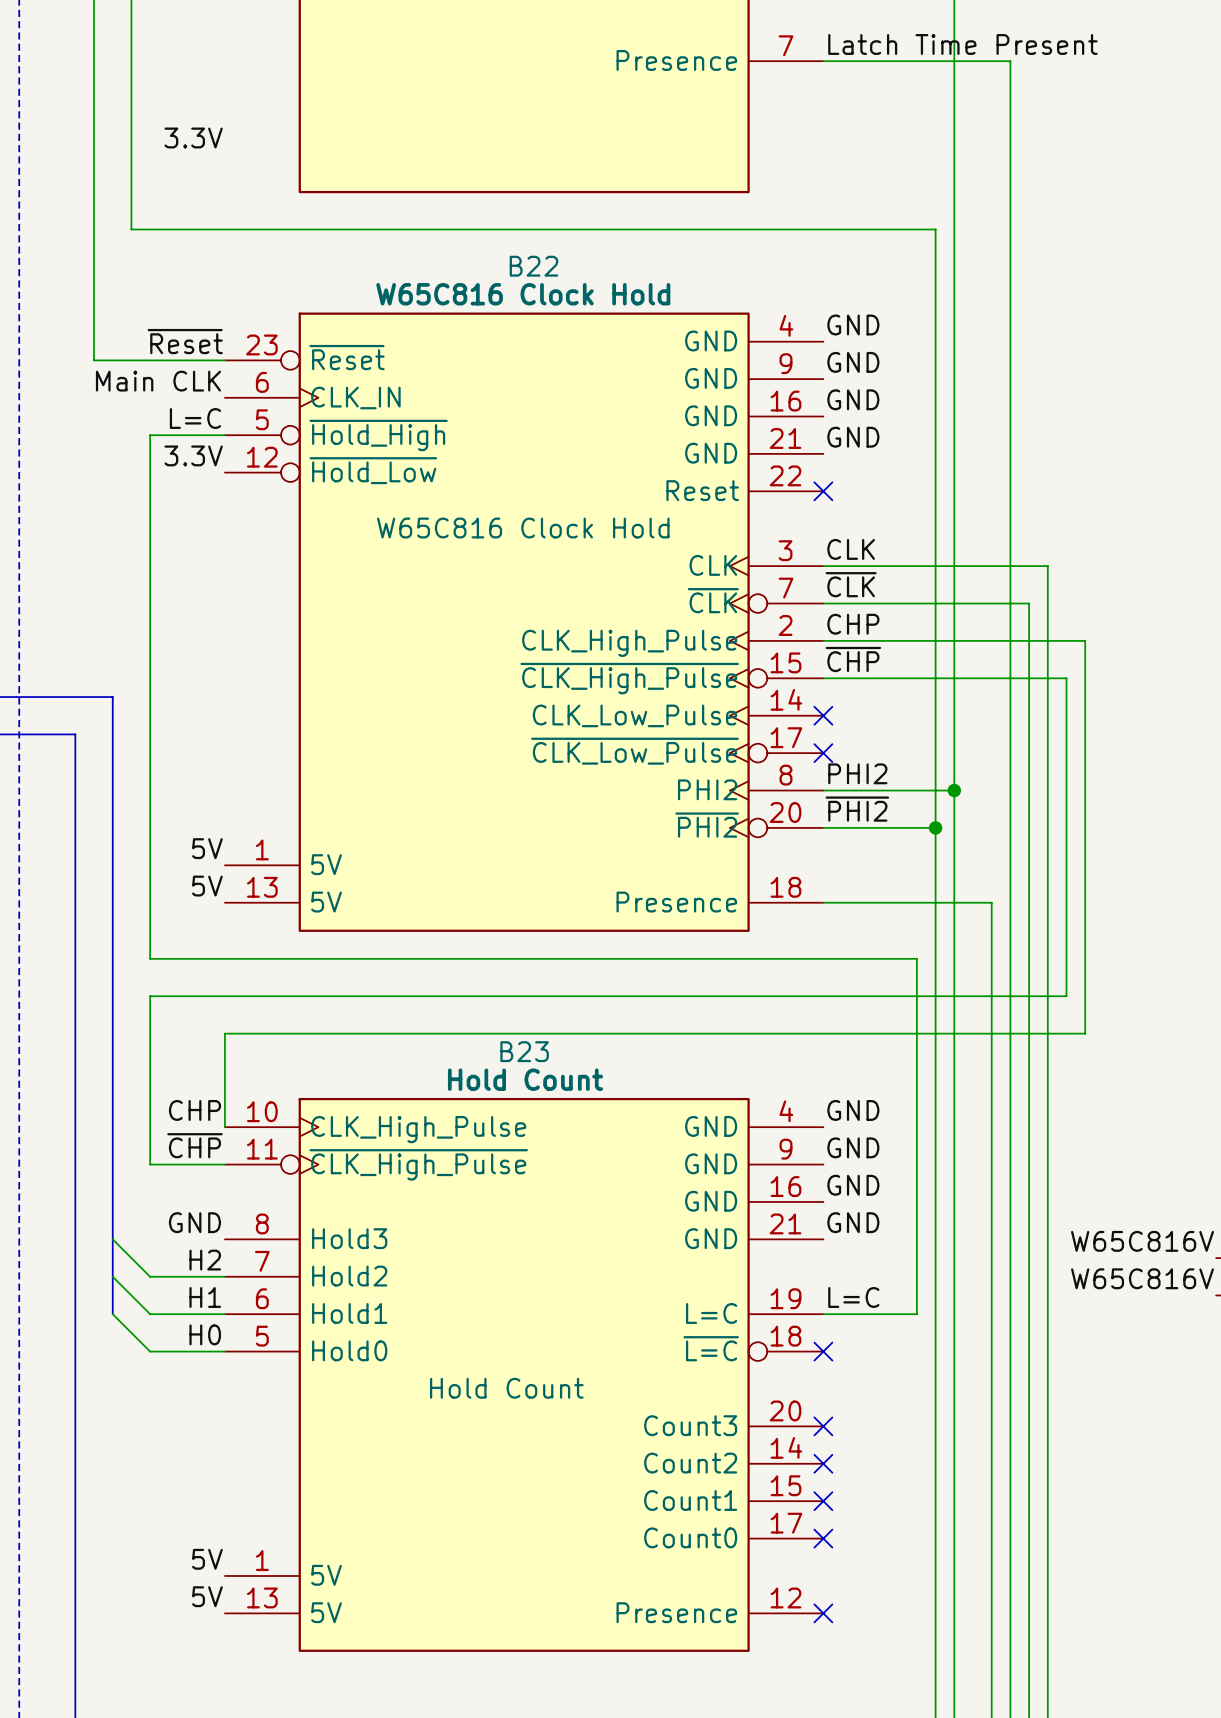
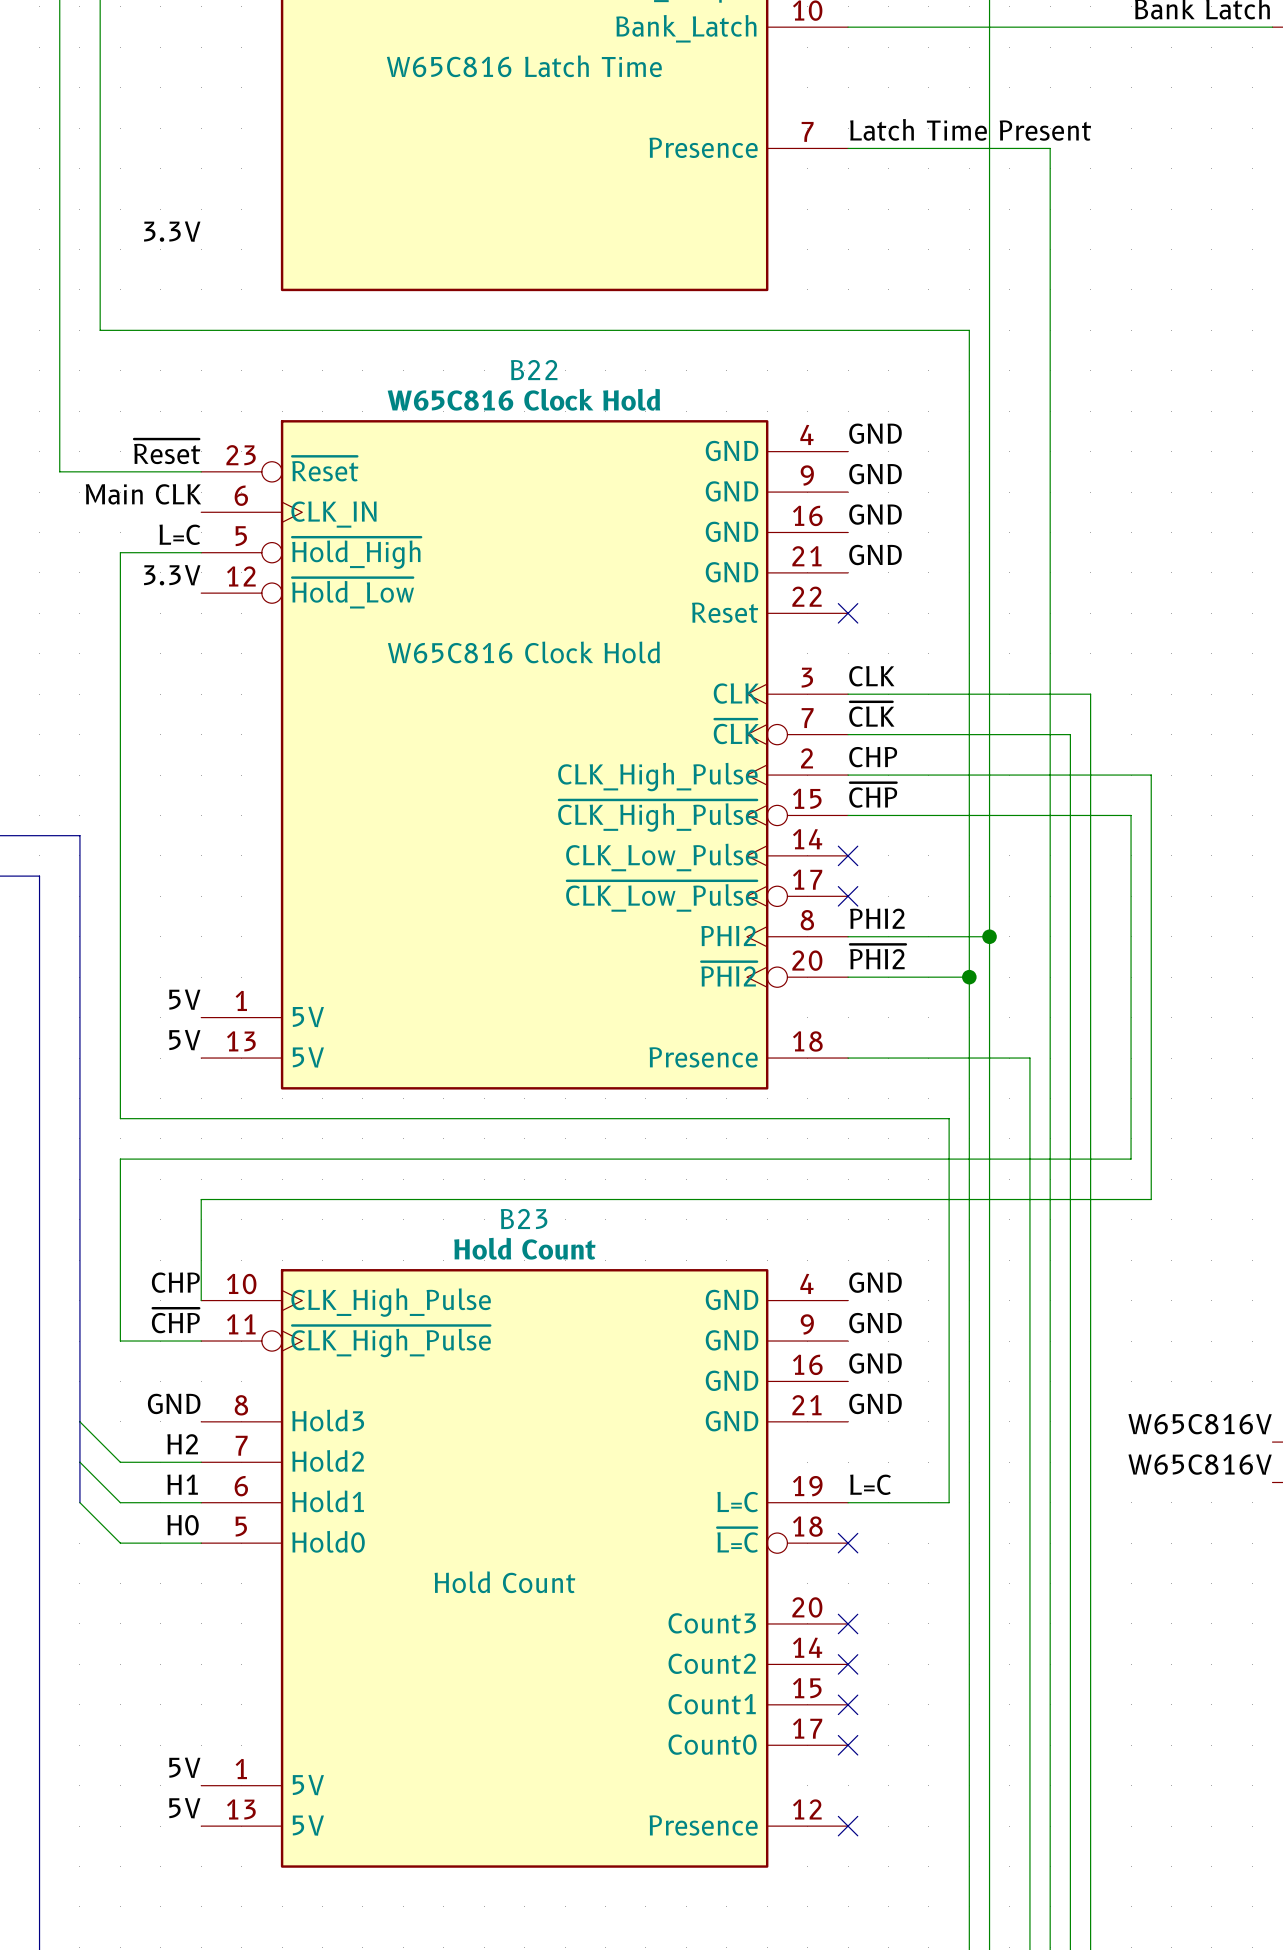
wire: (1085, 640) (1085, 678) -> (1110, 815) (1131, 815)
wire: none -> (1131, 775) (1151, 775) (1151, 1199) (1131, 1199)
wire: (1066, 678) (1066, 996) -> none
wire: (1085, 996) (1085, 1033) -> (1131, 1159) (1110, 1159)

